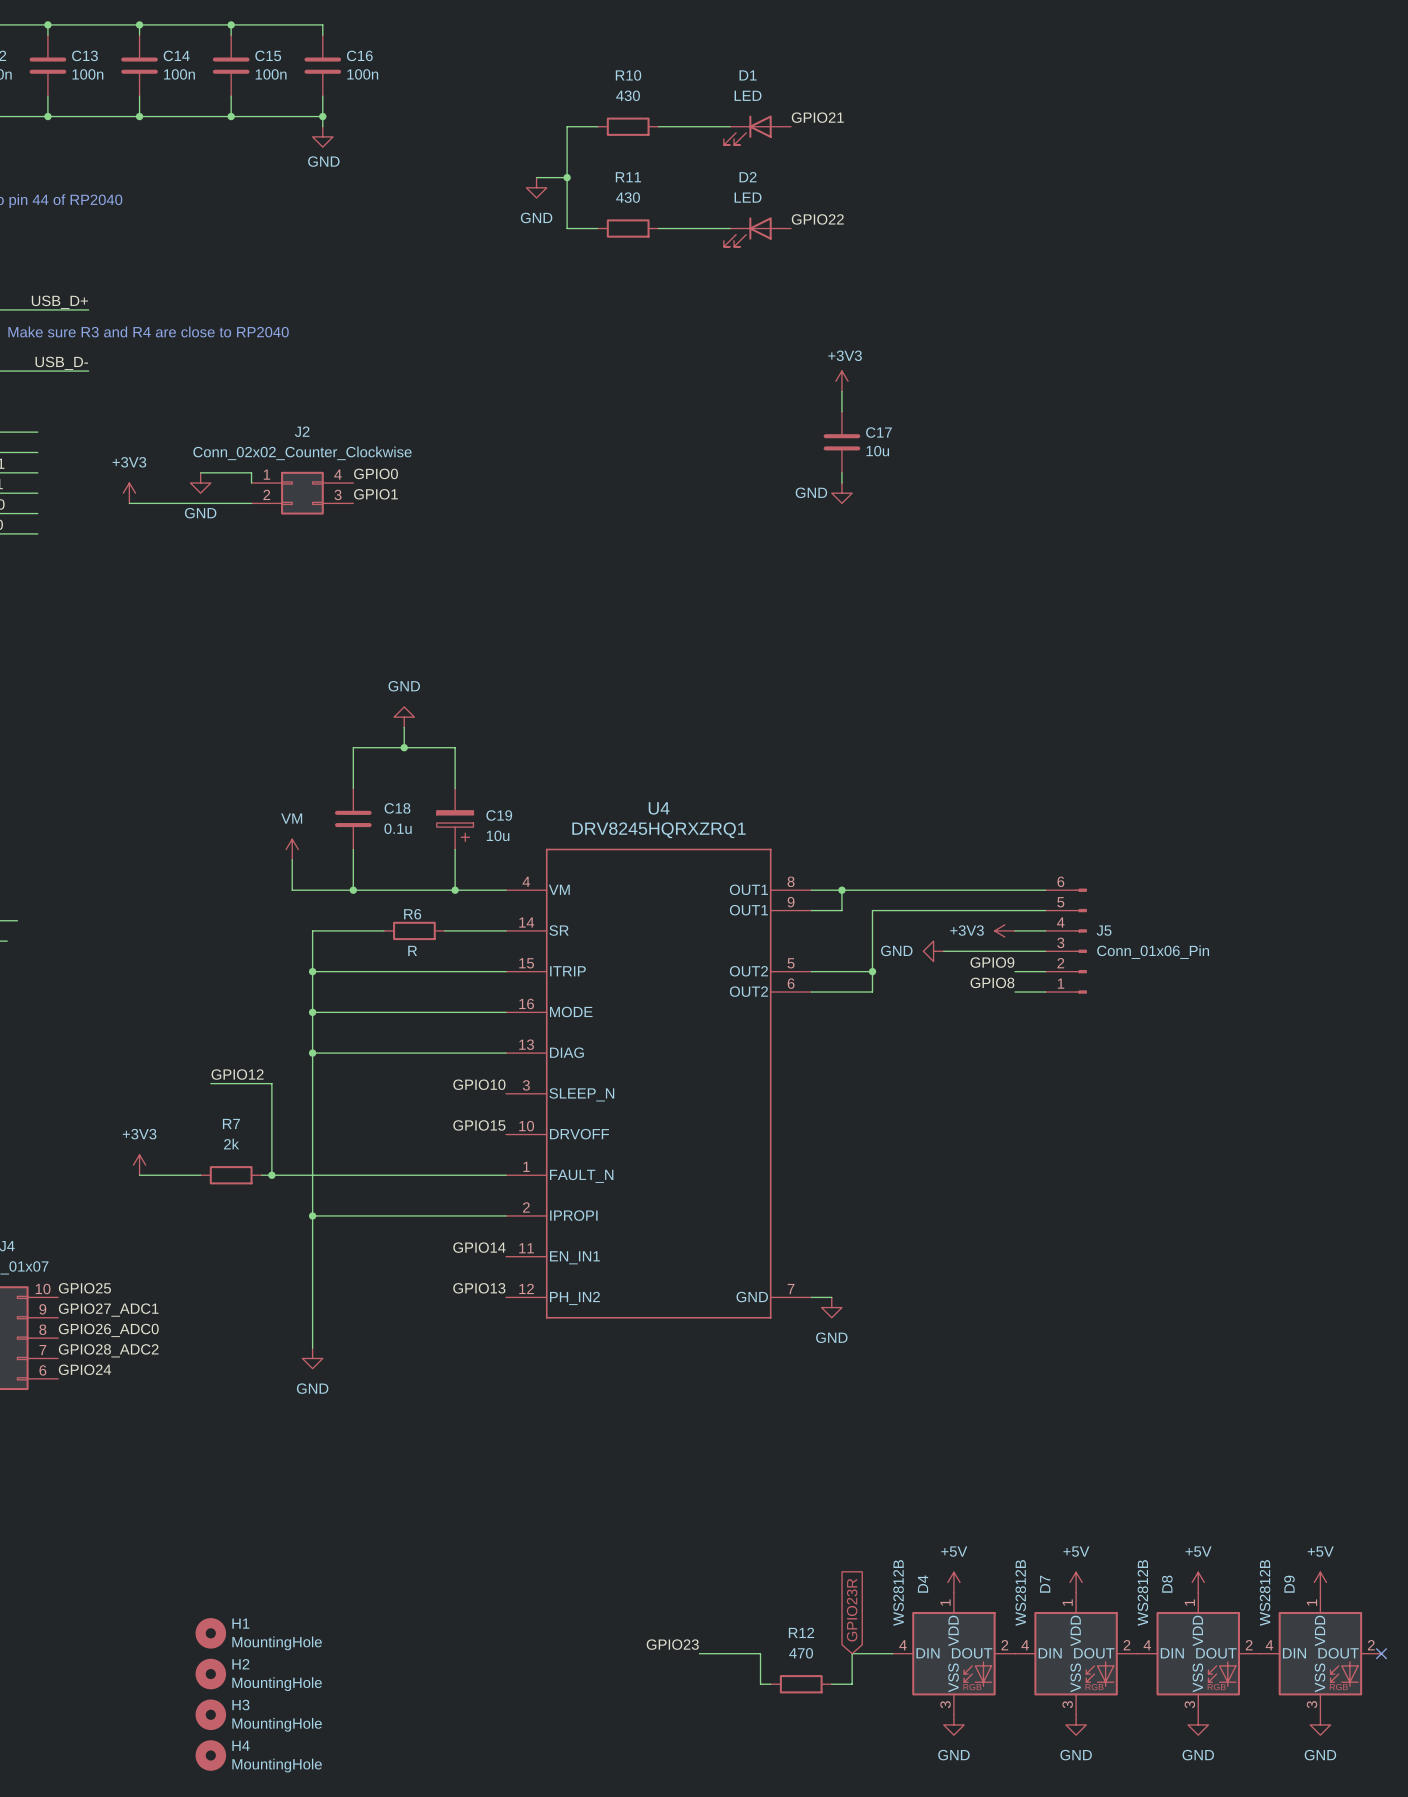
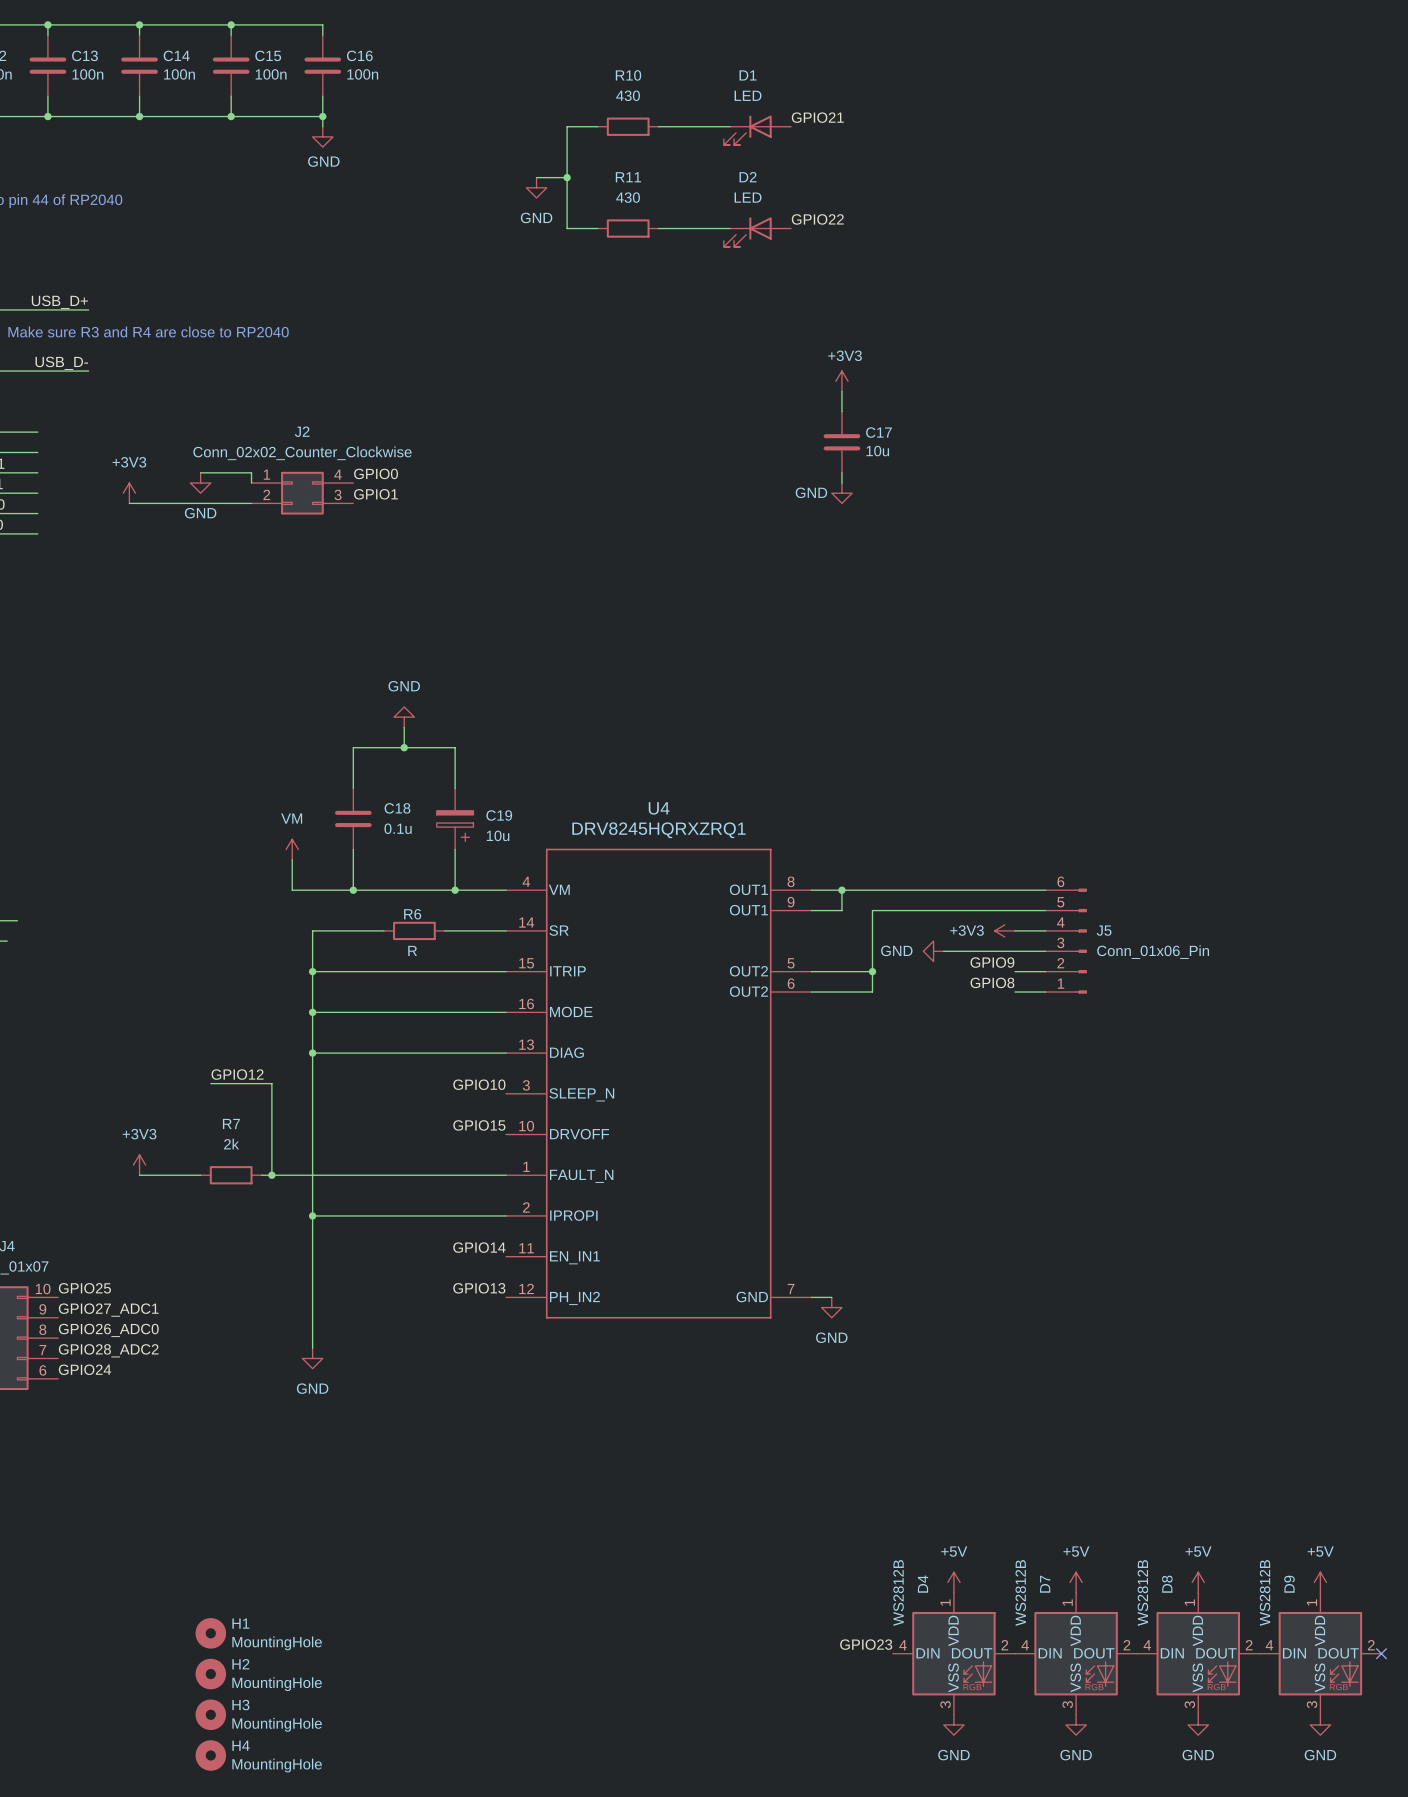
global label: GPIO23R (852, 1610) -> none
label position: GPIO23 (672, 1644) -> GPIO23 (866, 1644)
wire: (699, 1653) (760, 1653) (760, 1684) (770, 1684) -> none
wire: (892, 1653) (852, 1653) (852, 1684) (831, 1684) -> none
R12: 470 (801, 1684) -> none

